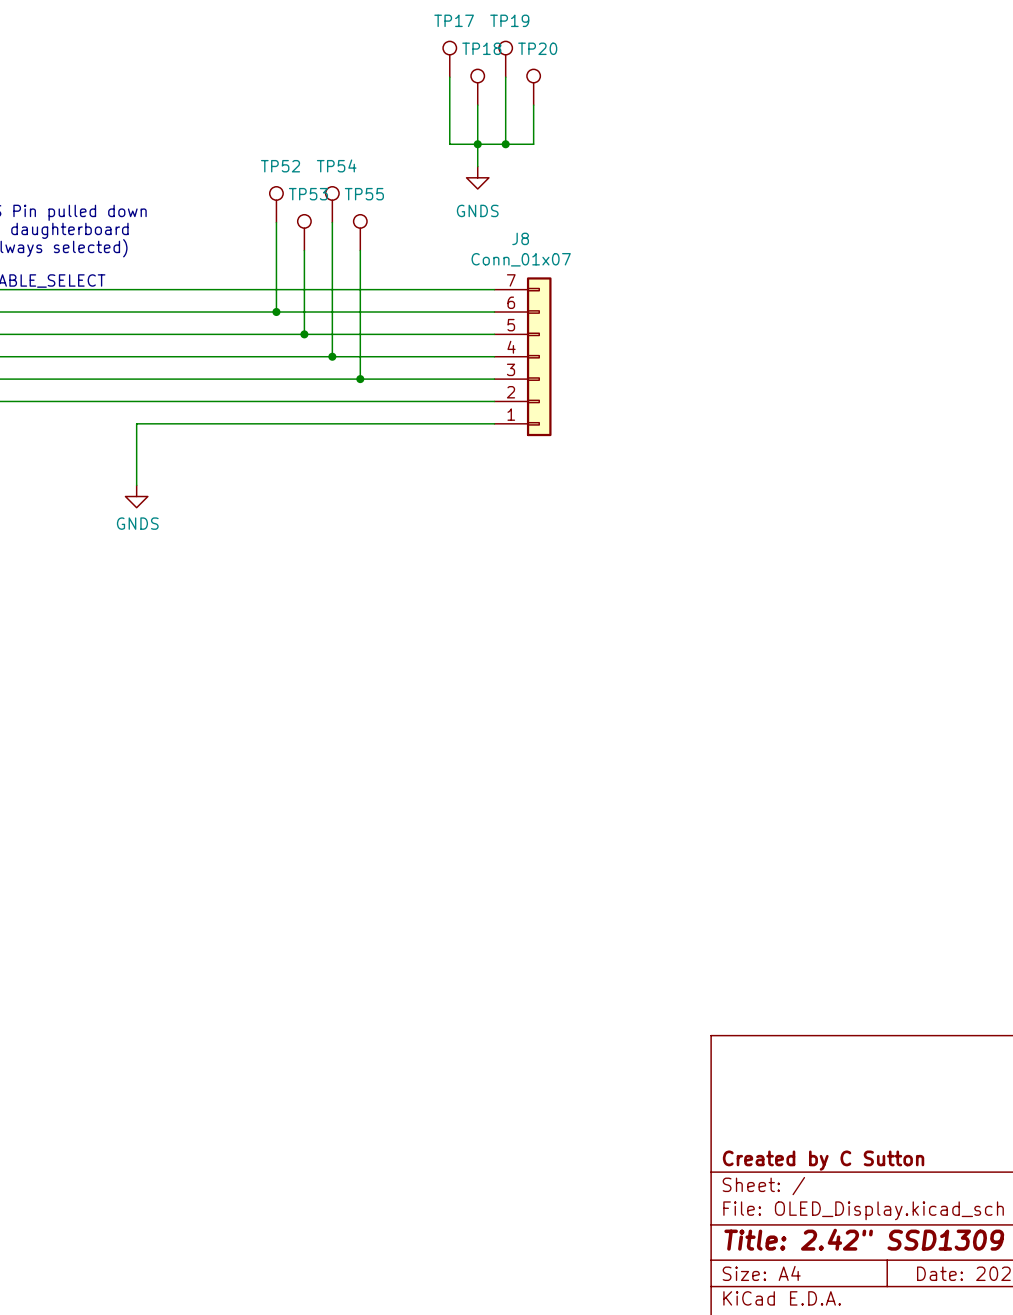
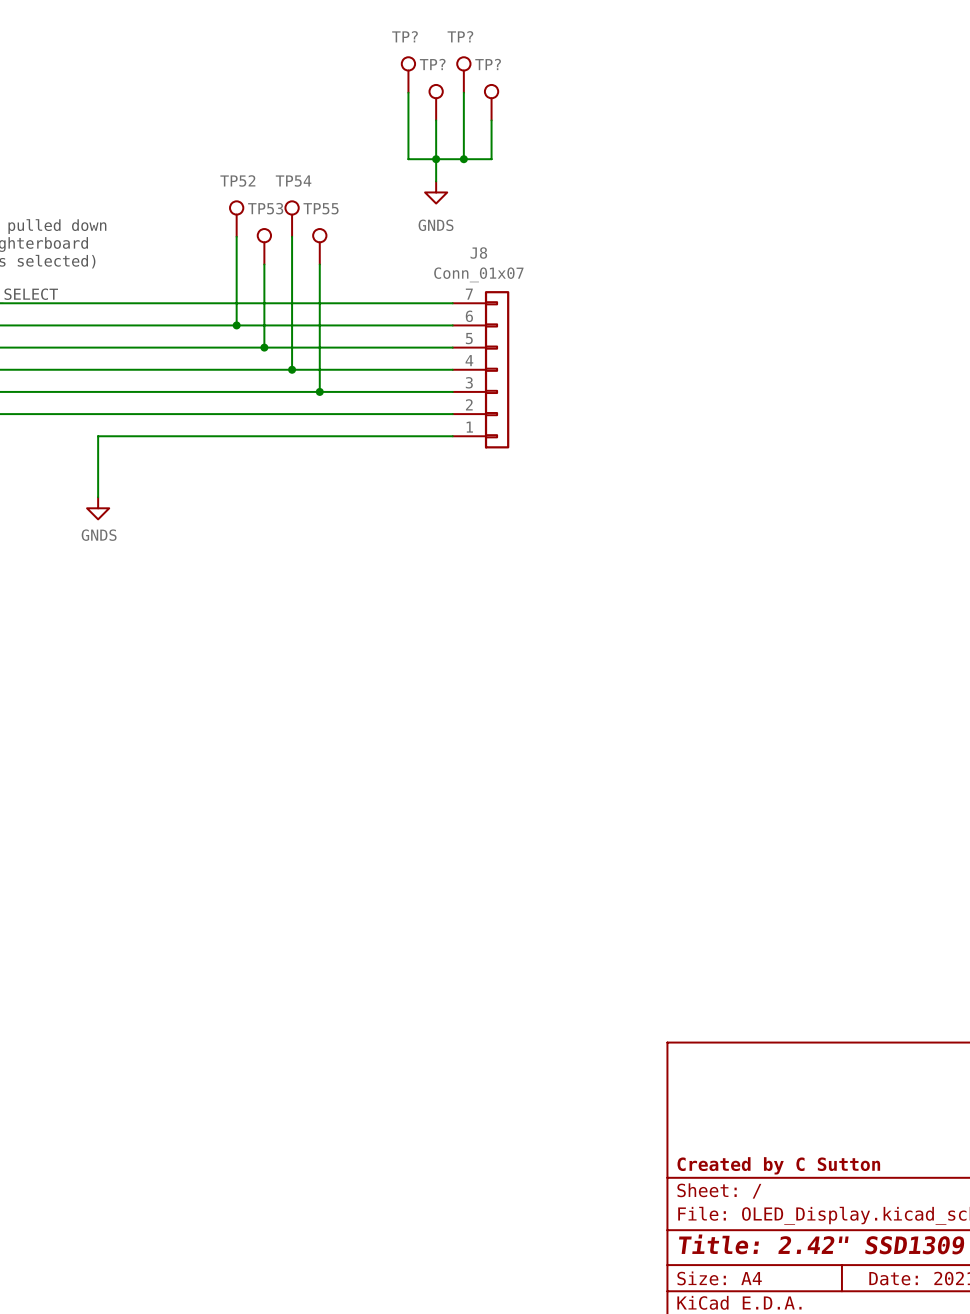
TP17 name: TP17 (454, 20) -> TP? (405, 36)
TP19 name: TP19 (509, 20) -> TP? (460, 36)
TP18 name: TP18 (481, 48) -> TP? (432, 64)
TP20 name: TP20 (537, 48) -> TP? (488, 64)

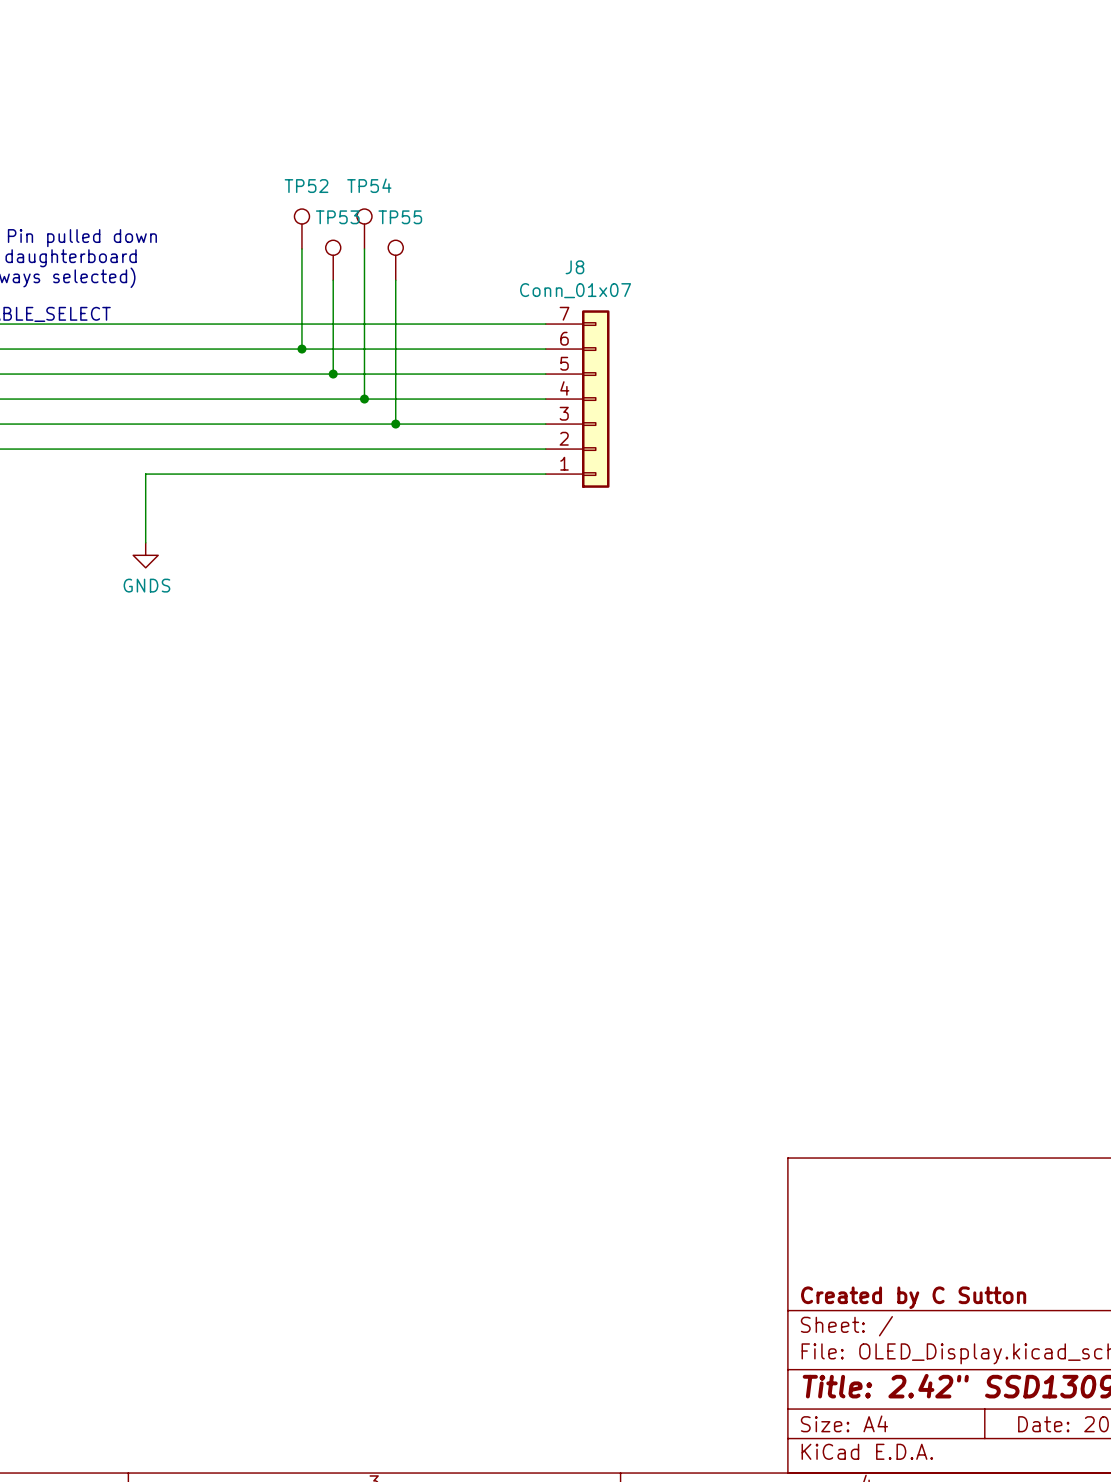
TP?: (408, 74) -> none
TP?: (463, 74) -> none
wire: (408, 92) (408, 159) (491, 159) (491, 120) -> none
wire: (463, 92) (463, 159) -> none
TP?: (436, 102) -> none
TP?: (491, 102) -> none
wire: (436, 120) (436, 181) -> none
junction: (436, 159) -> none
junction: (463, 159) -> none
power symbol: GNDS (436, 192) -> none

